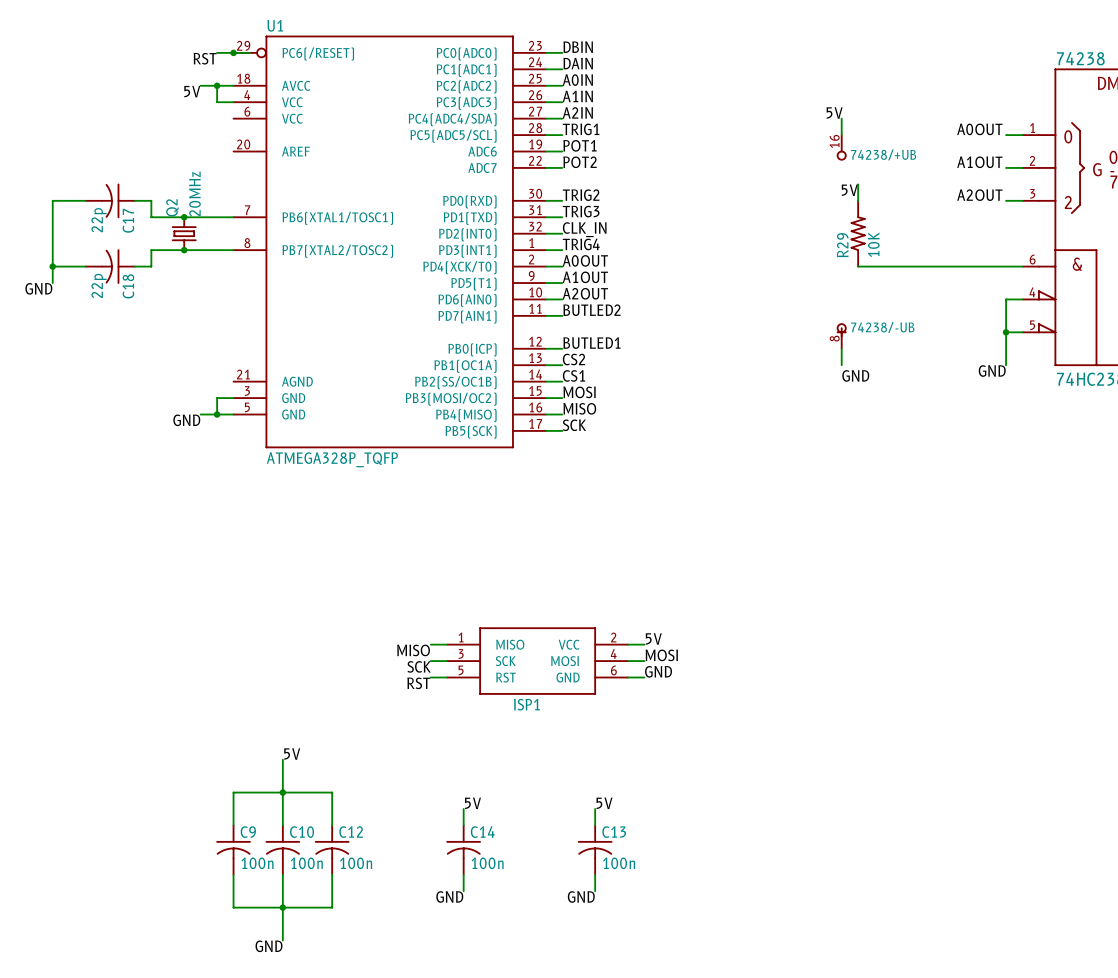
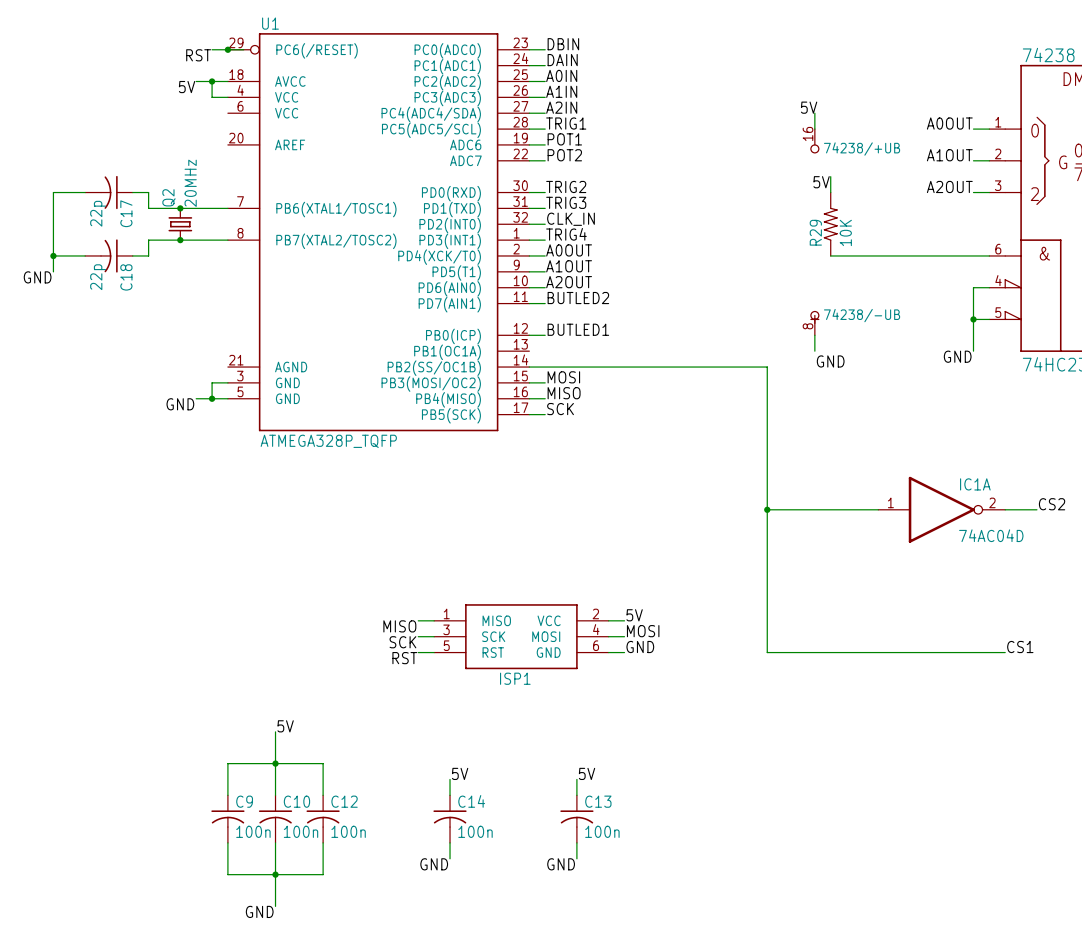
label: CS2 (574, 359) -> none
wire: (545, 365) (562, 365) -> none
label: CS1 (573, 375) -> none
wire: none -> (545, 367) (767, 367) (767, 652) (1005, 652)
label: none -> CS2 (1052, 504)
wire: none -> (767, 509) (878, 509)
junction: none -> (767, 509)
IC1A: none -> 74AC04D (941, 509)
wire: none -> (1005, 509) (1036, 509)
label: none -> CS1 (1020, 647)

